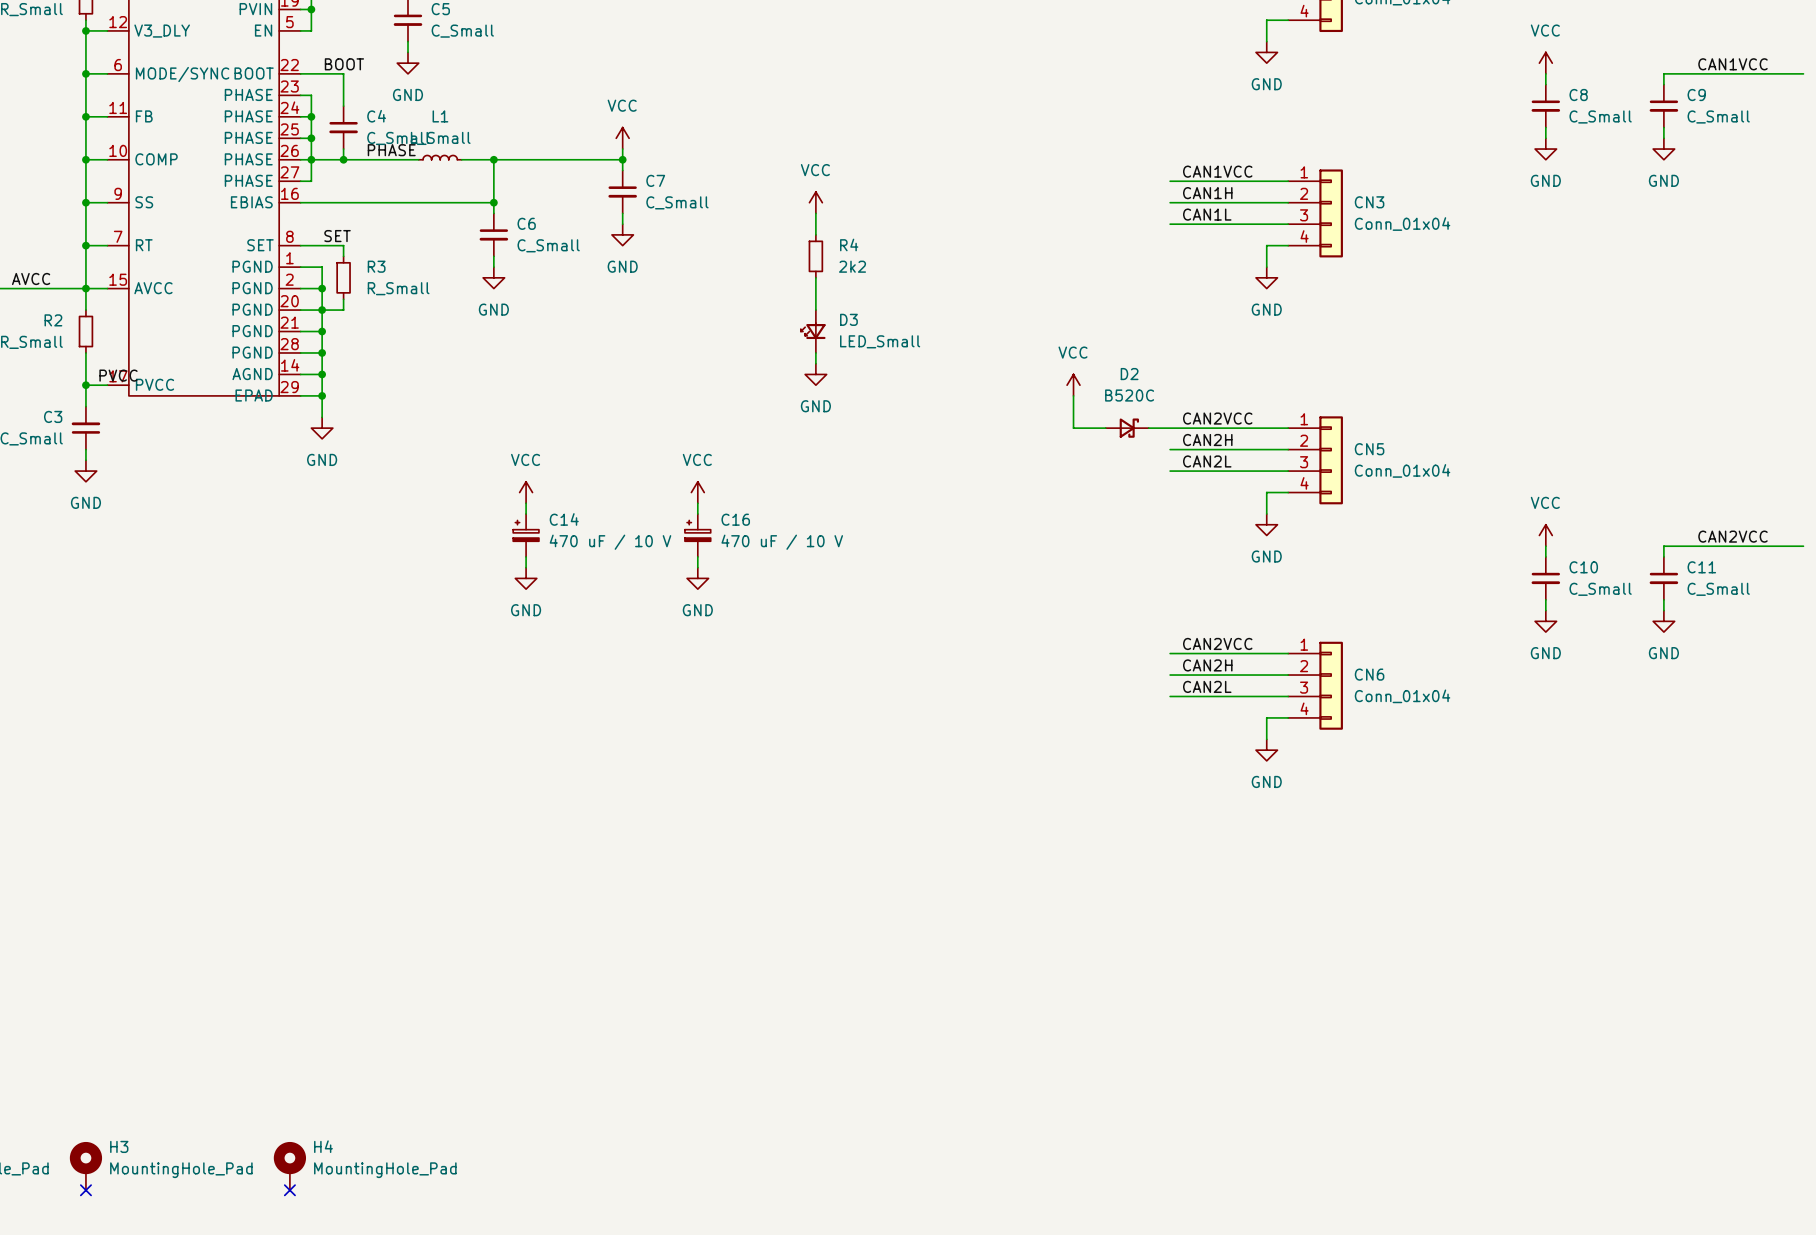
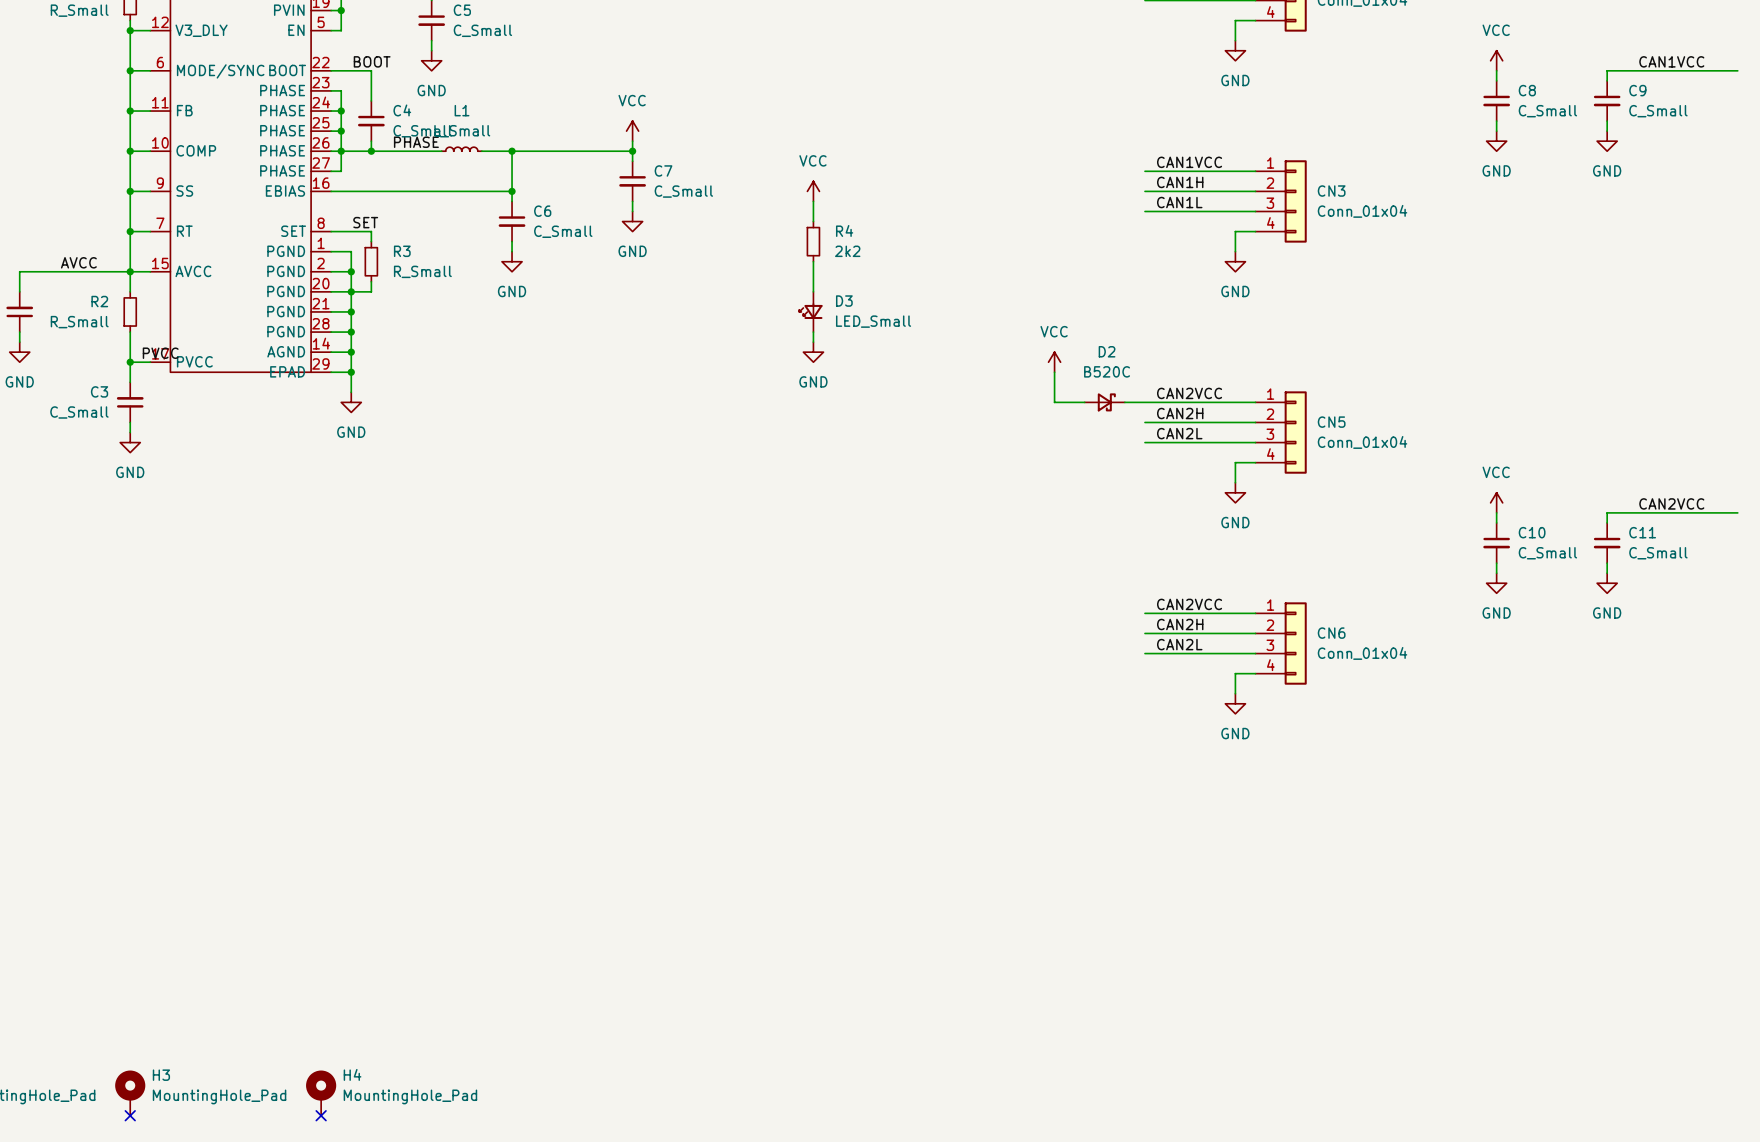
power symbol: VCC (526, 492) -> none
power symbol: VCC (697, 492) -> none
wire: (526, 503) (526, 514) -> none
wire: (697, 503) (697, 514) -> none
C14: 470 uF / 10 V (526, 535) -> none
C16: 470 uF / 10 V (697, 535) -> none
wire: (526, 556) (526, 567) -> none
wire: (697, 556) (697, 567) -> none
power symbol: GND (526, 578) -> none
power symbol: GND (697, 578) -> none

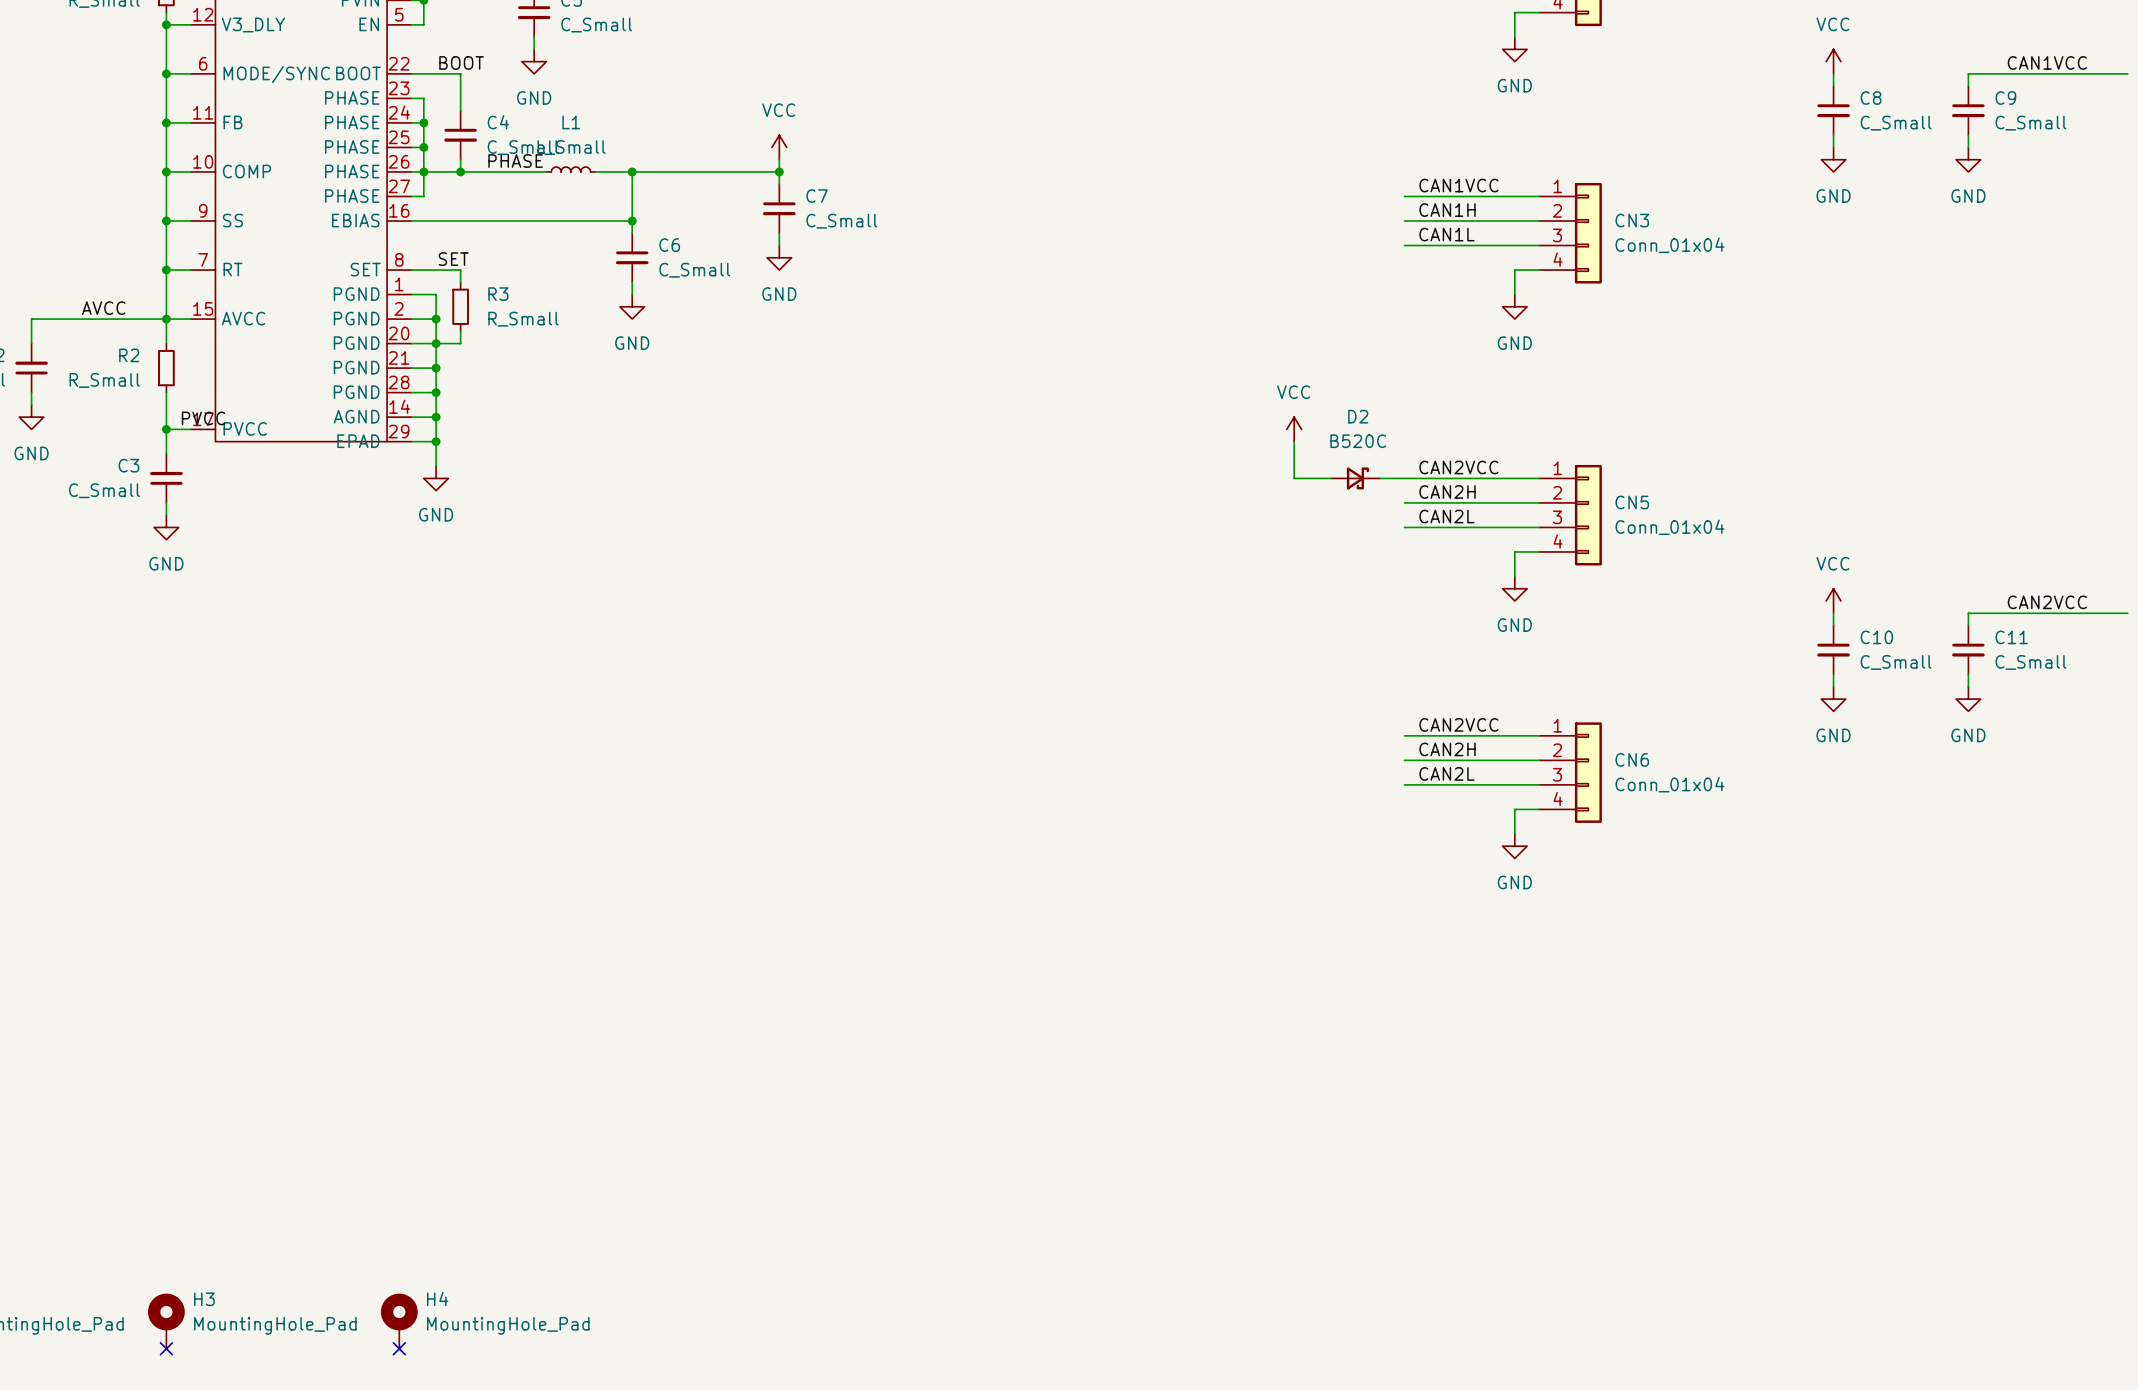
power symbol: VCC (813, 191) -> none
wire: (813, 201) (813, 221) -> none
R4: 2k2 (813, 241) -> none
wire: (813, 261) (813, 291) -> none
D3: LED_Small (810, 311) -> none
wire: (813, 332) (813, 342) -> none
power symbol: GND (813, 352) -> none

